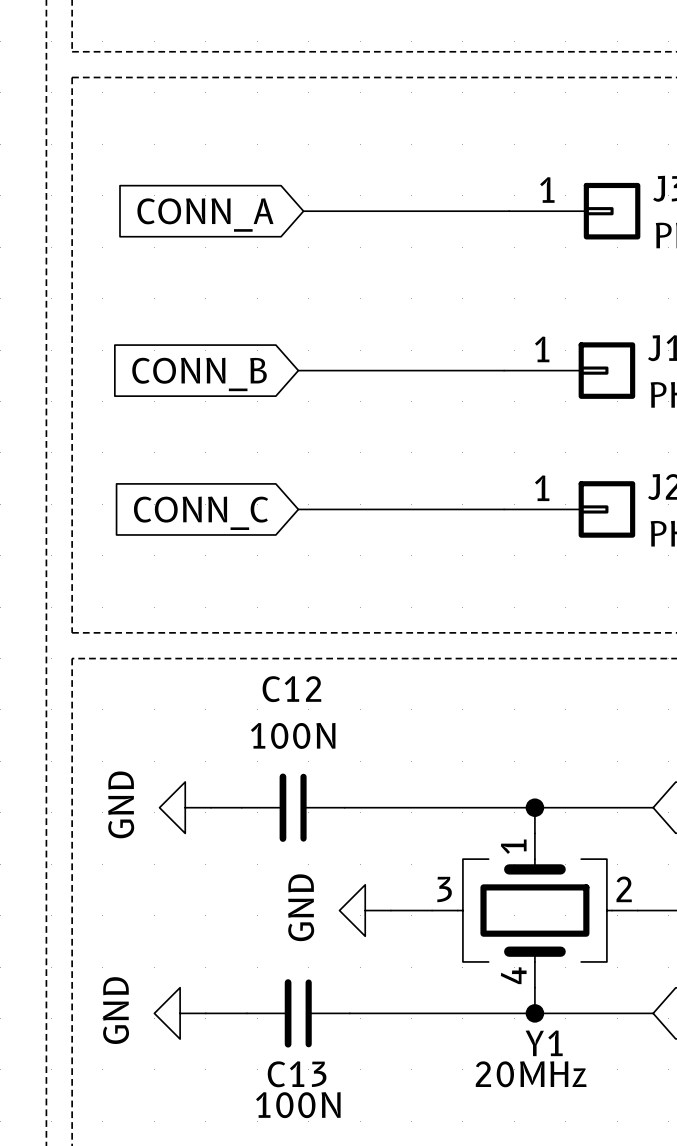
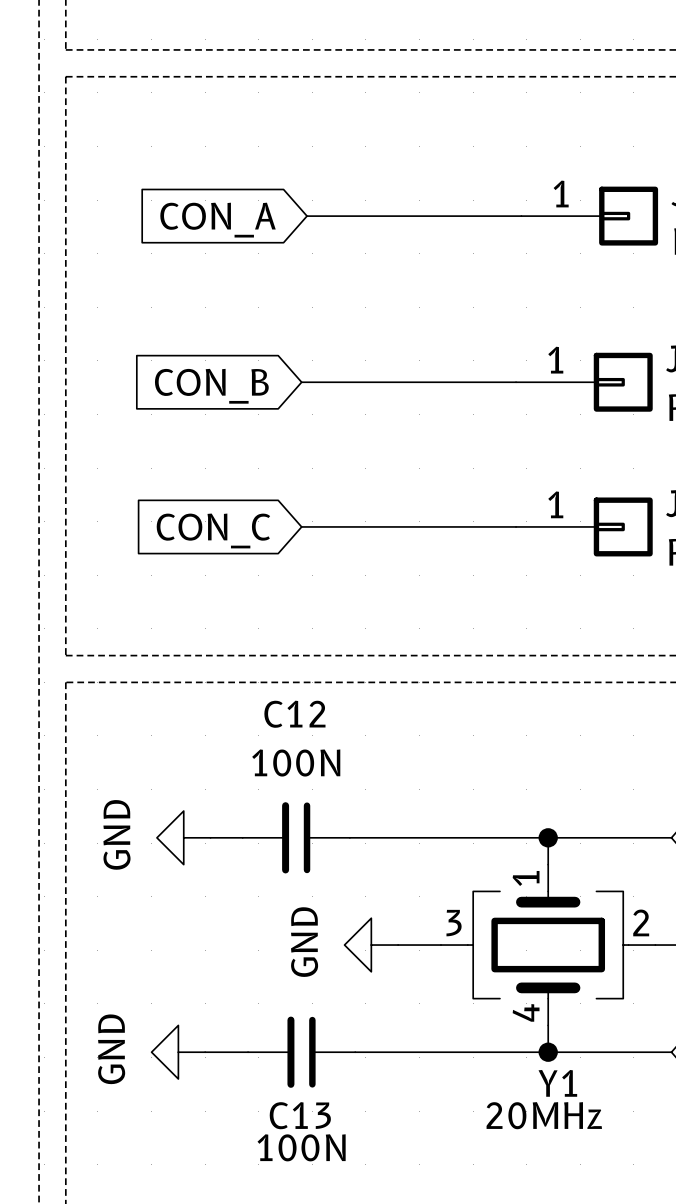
global label: CONN_A (205, 215) -> CON_A (218, 220)
global label: CONN_B (199, 374) -> CON_B (211, 386)
global label: CONN_C (201, 513) -> CON_C (213, 530)

